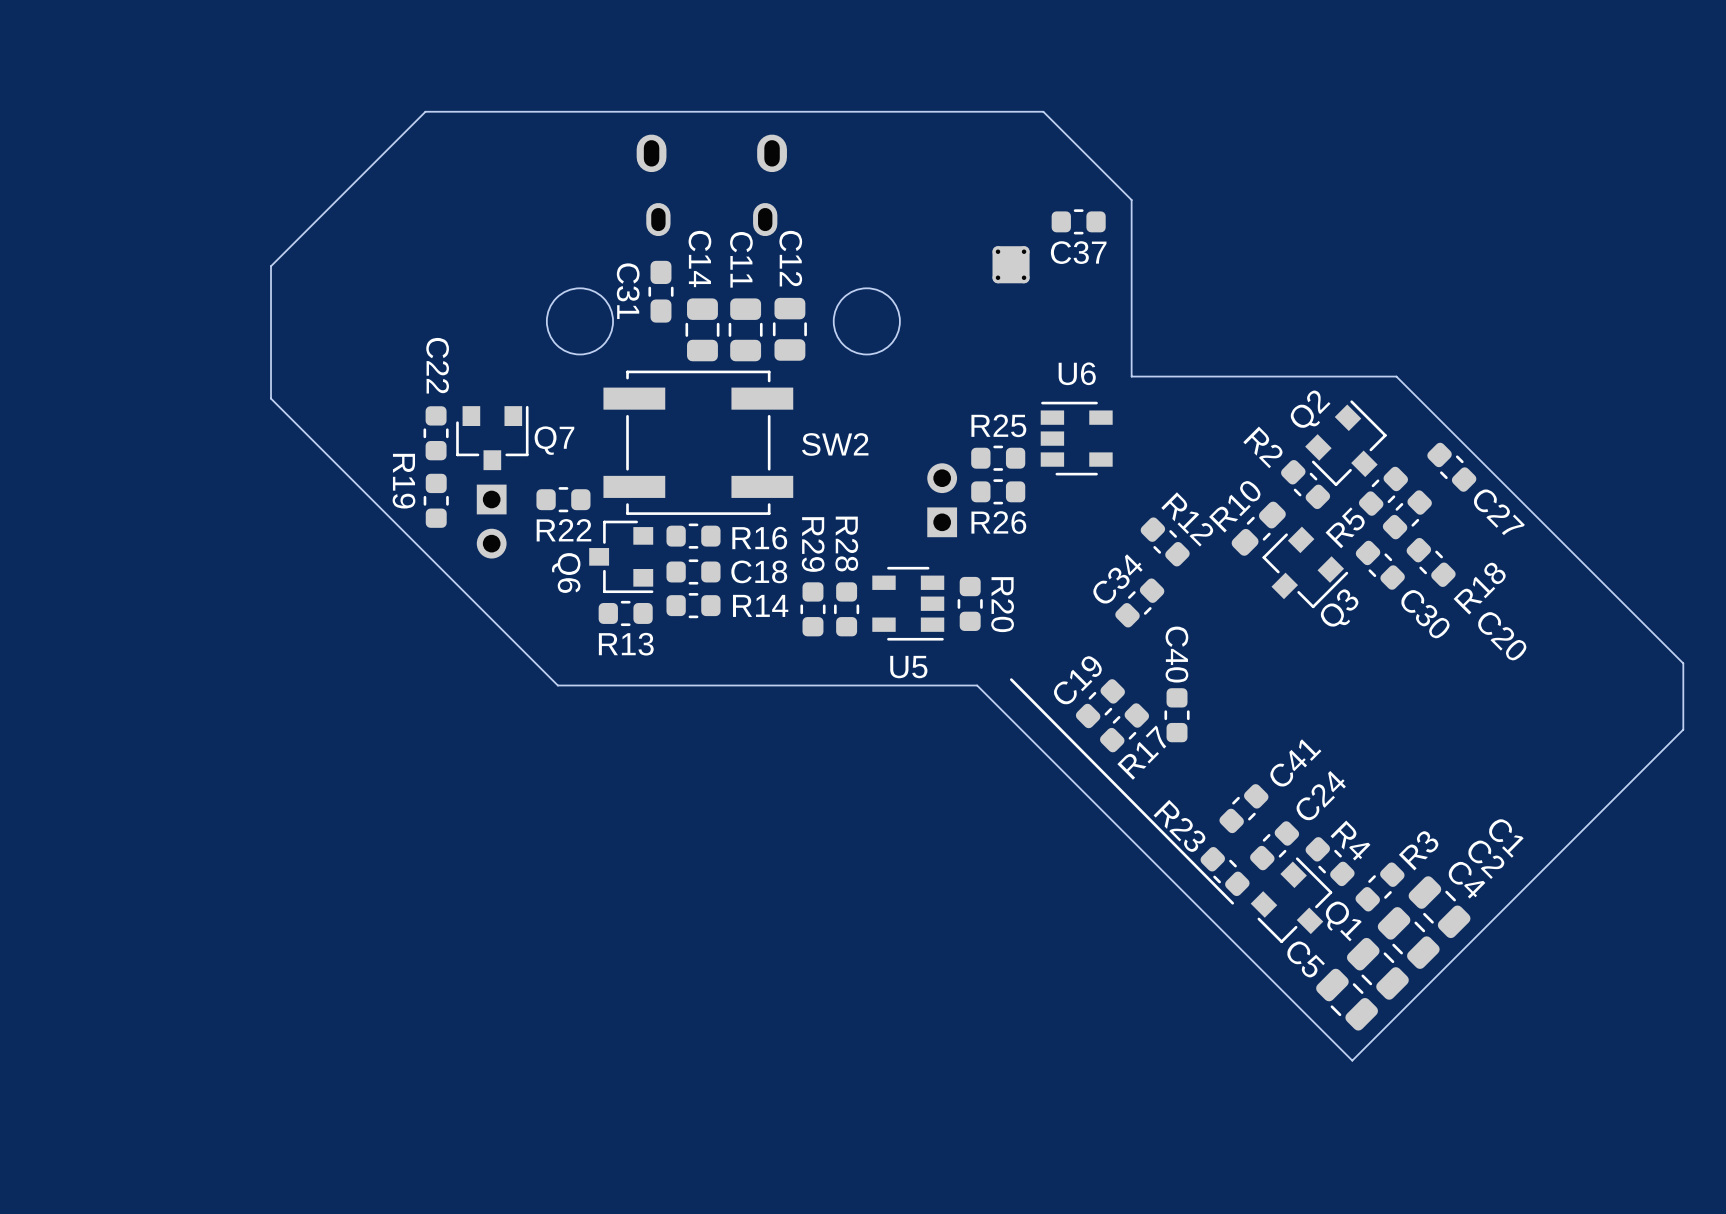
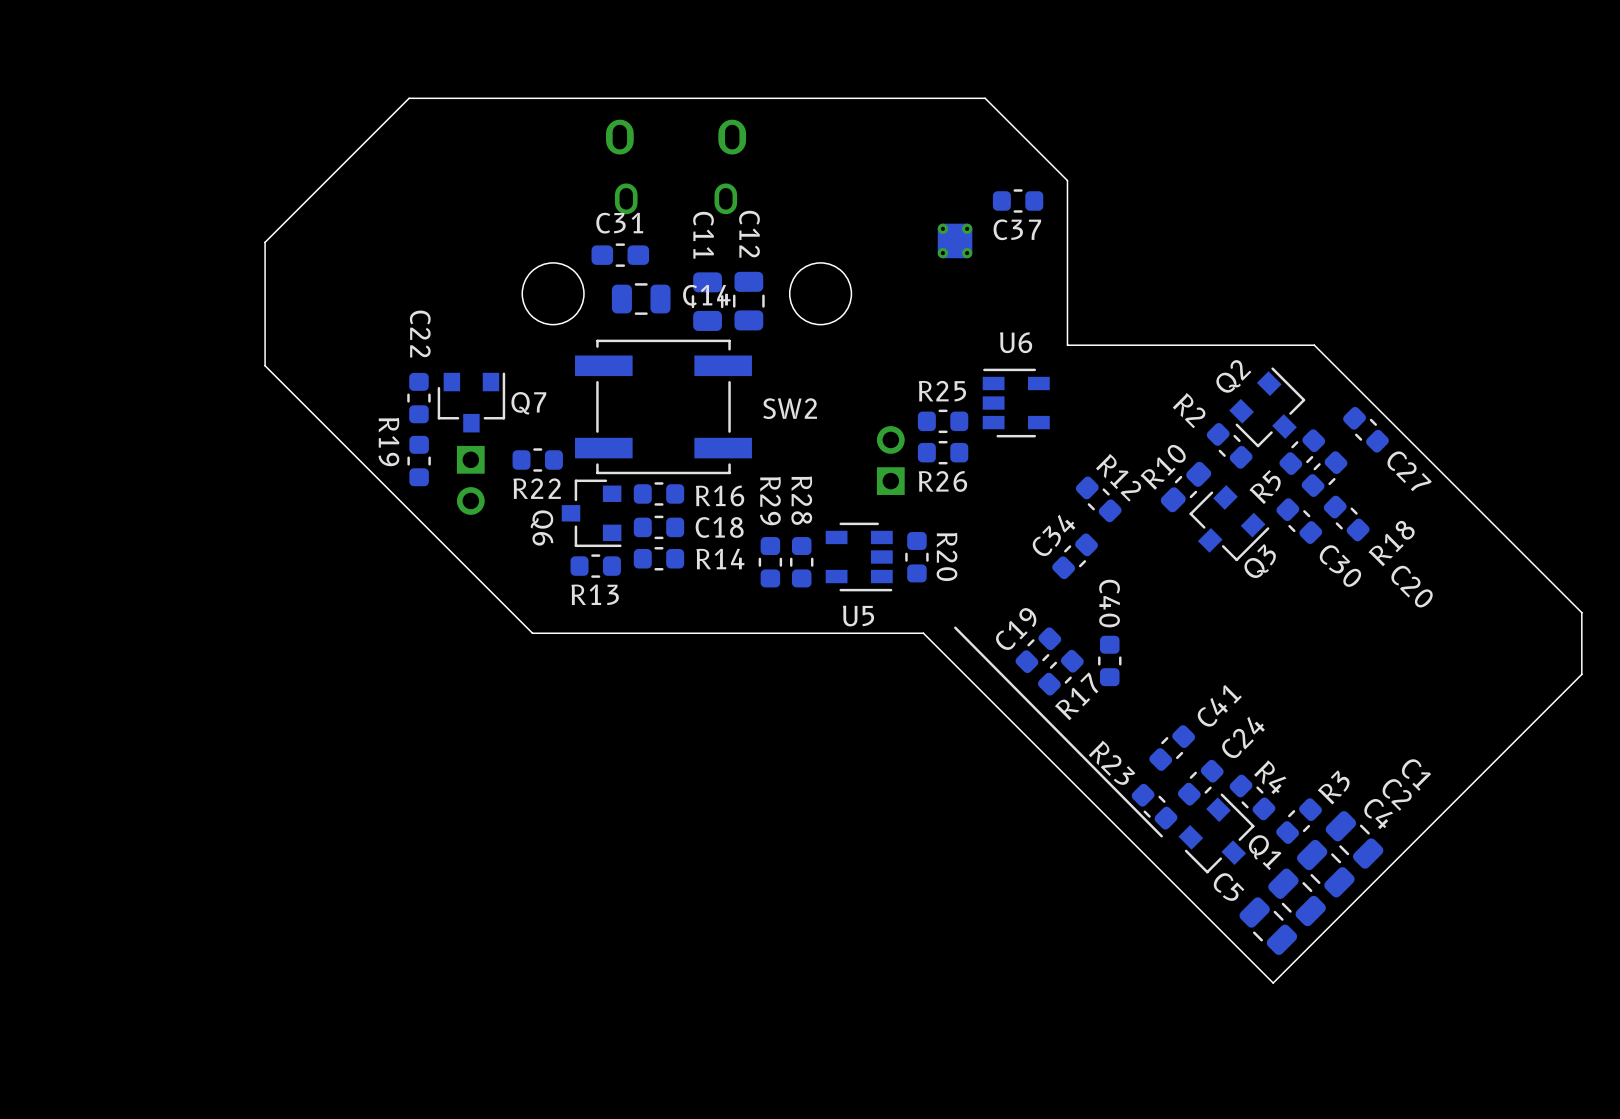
C31 rotation: 0° (660, 291) -> 90° clockwise (620, 255)
C14 rotation: 0° (702, 329) -> 90° clockwise (641, 299)

